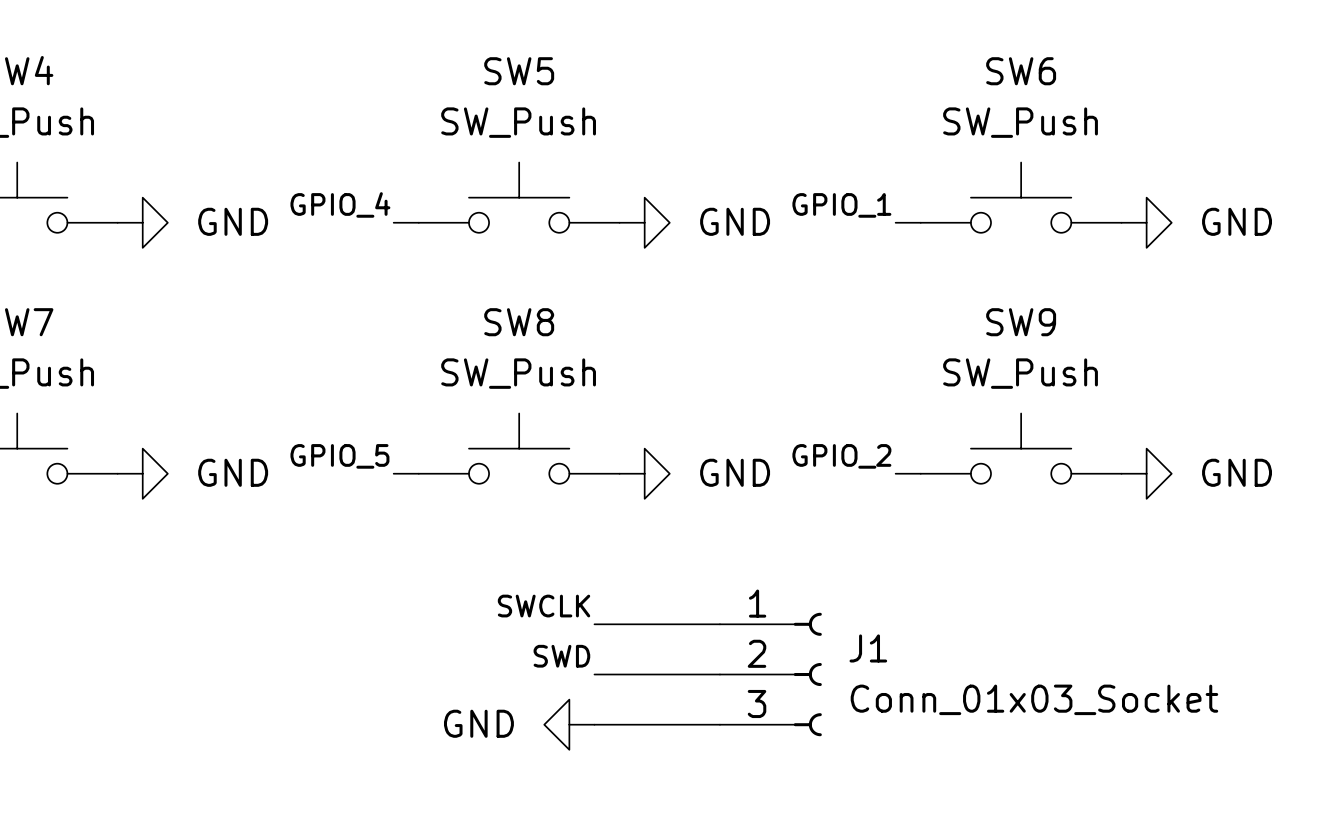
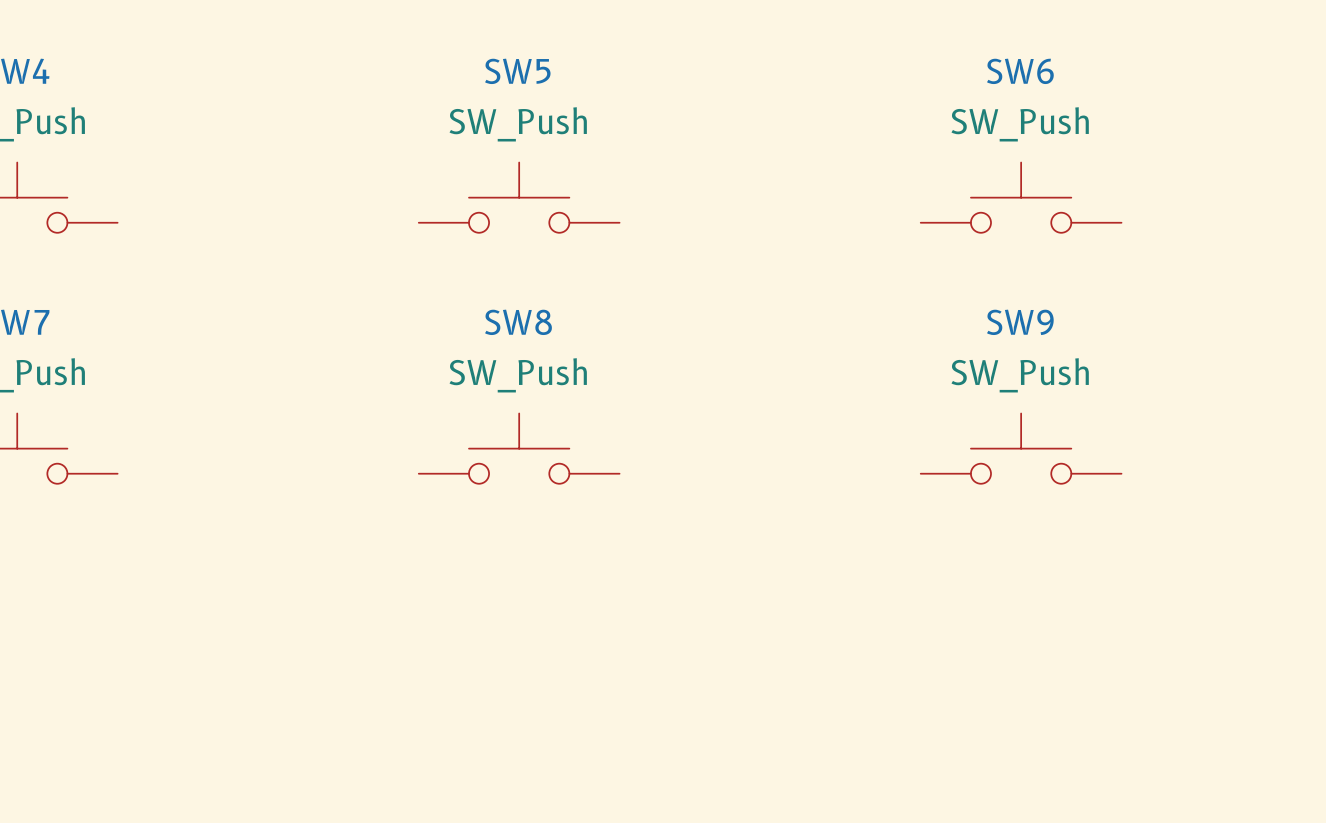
label: GPIO_4 (340, 204) -> none
label: GPIO_1 (841, 205) -> none
power symbol: GND (142, 222) -> none
wire: (393, 222) (418, 222) -> none
power symbol: GND (644, 222) -> none
wire: (895, 222) (920, 222) -> none
power symbol: GND (1146, 222) -> none
label: GPIO_5 (339, 456) -> none
label: GPIO_2 (841, 456) -> none
power symbol: GND (142, 473) -> none
wire: (393, 473) (418, 473) -> none
power symbol: GND (644, 473) -> none
wire: (895, 473) (920, 473) -> none
power symbol: GND (1146, 473) -> none
label: SWCLK (544, 606) -> none
wire: (594, 624) (719, 624) -> none
label: SWD (561, 656) -> none
wire: (594, 674) (719, 674) -> none
J1: Conn_01x03_Socket (770, 674) -> none
power symbol: GND (569, 724) -> none
wire: (594, 724) (719, 724) -> none

